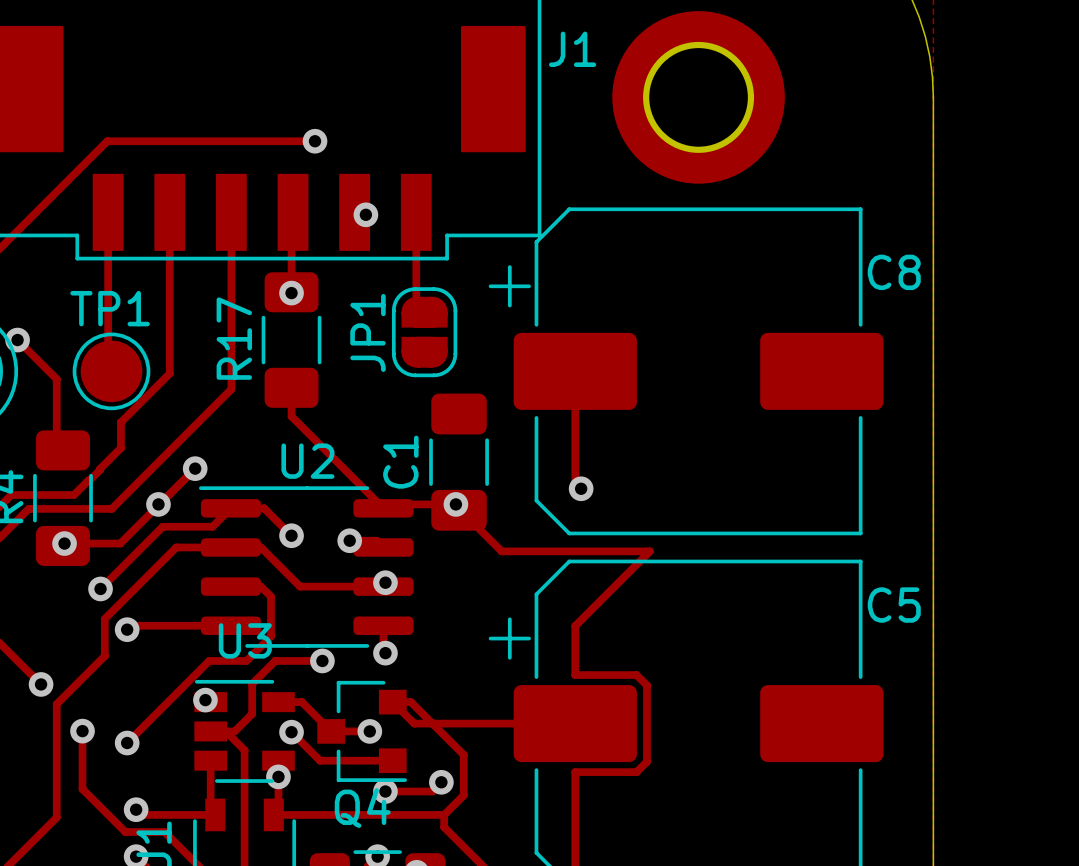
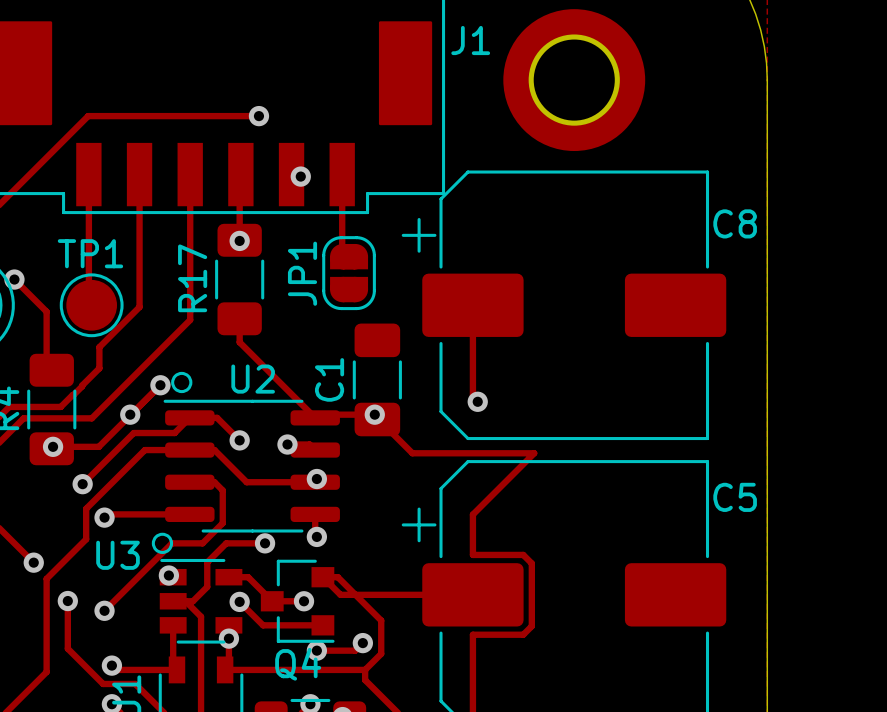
drawing: none -> [171, 371, 193, 394]
U3 name position: U3 (245, 640) -> U3 (118, 555)
drawing: none -> [151, 532, 174, 554]

